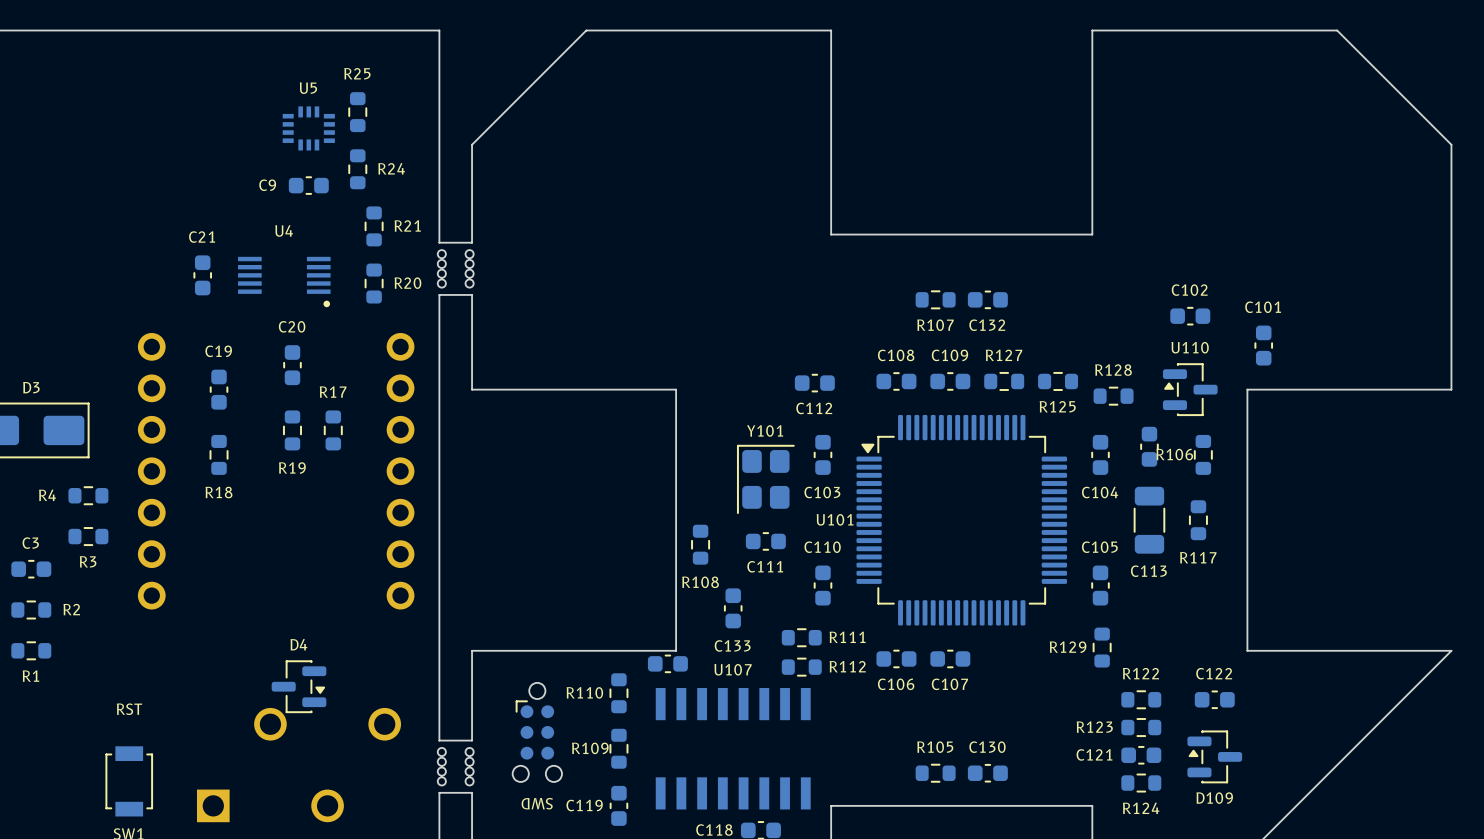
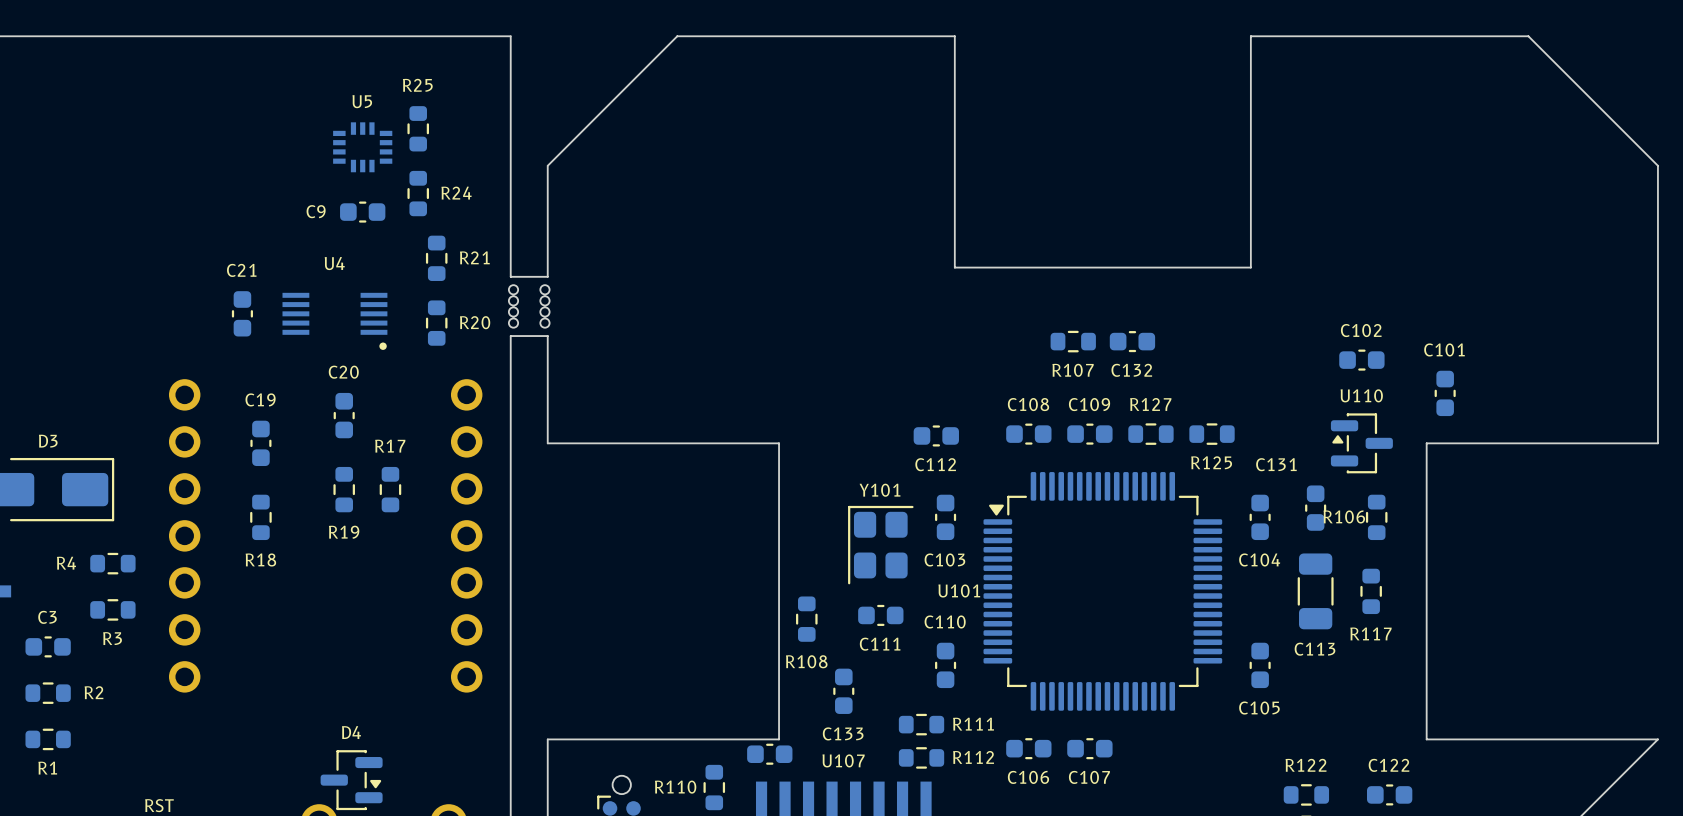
R128: (1113, 396) -> none
C131 name: none -> C131 (1276, 464)
C105 name position: C105 (1099, 547) -> C105 (1259, 708)
R129: (1102, 647) -> none

